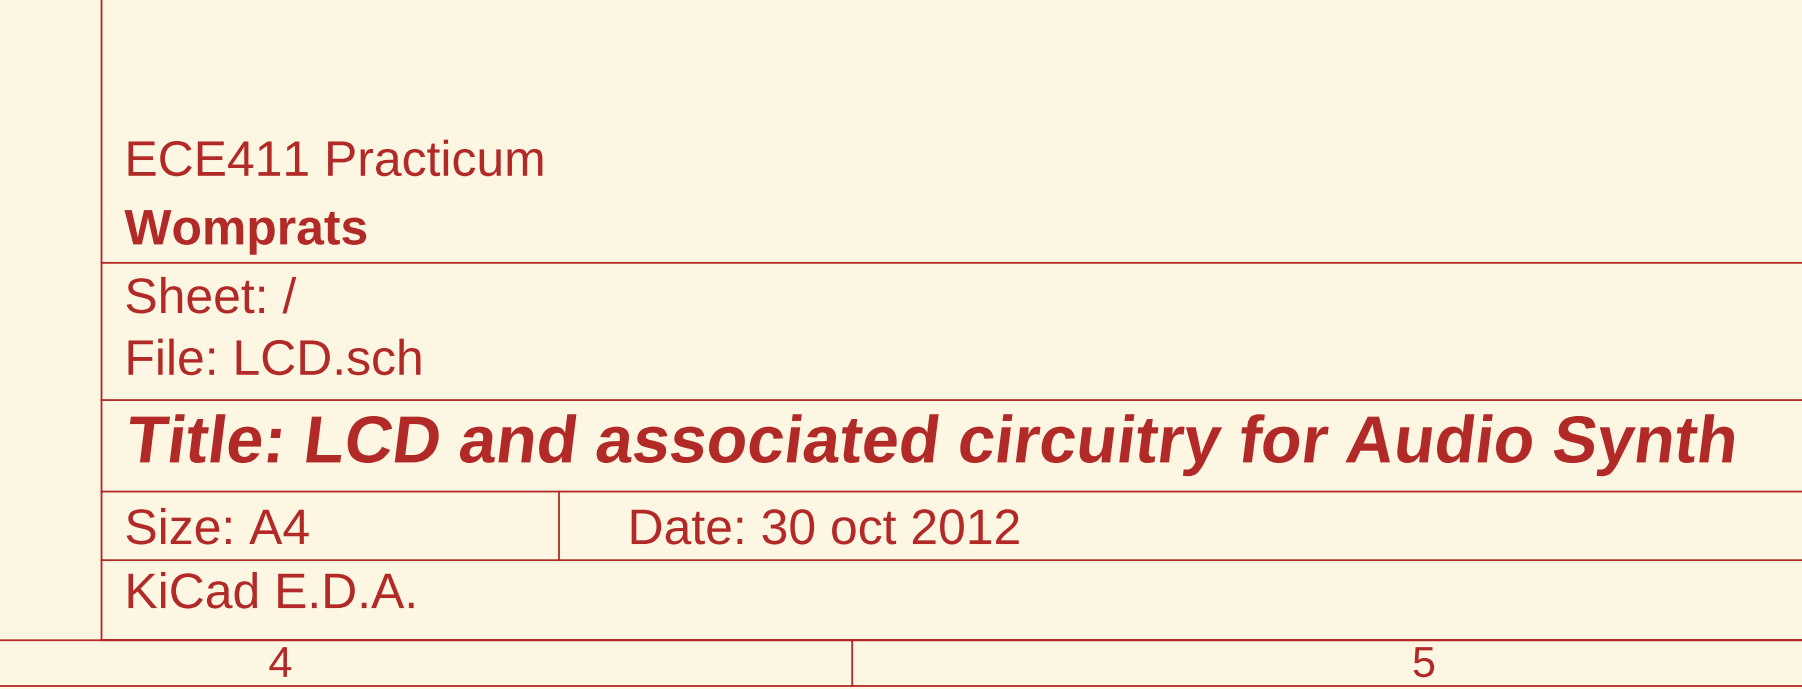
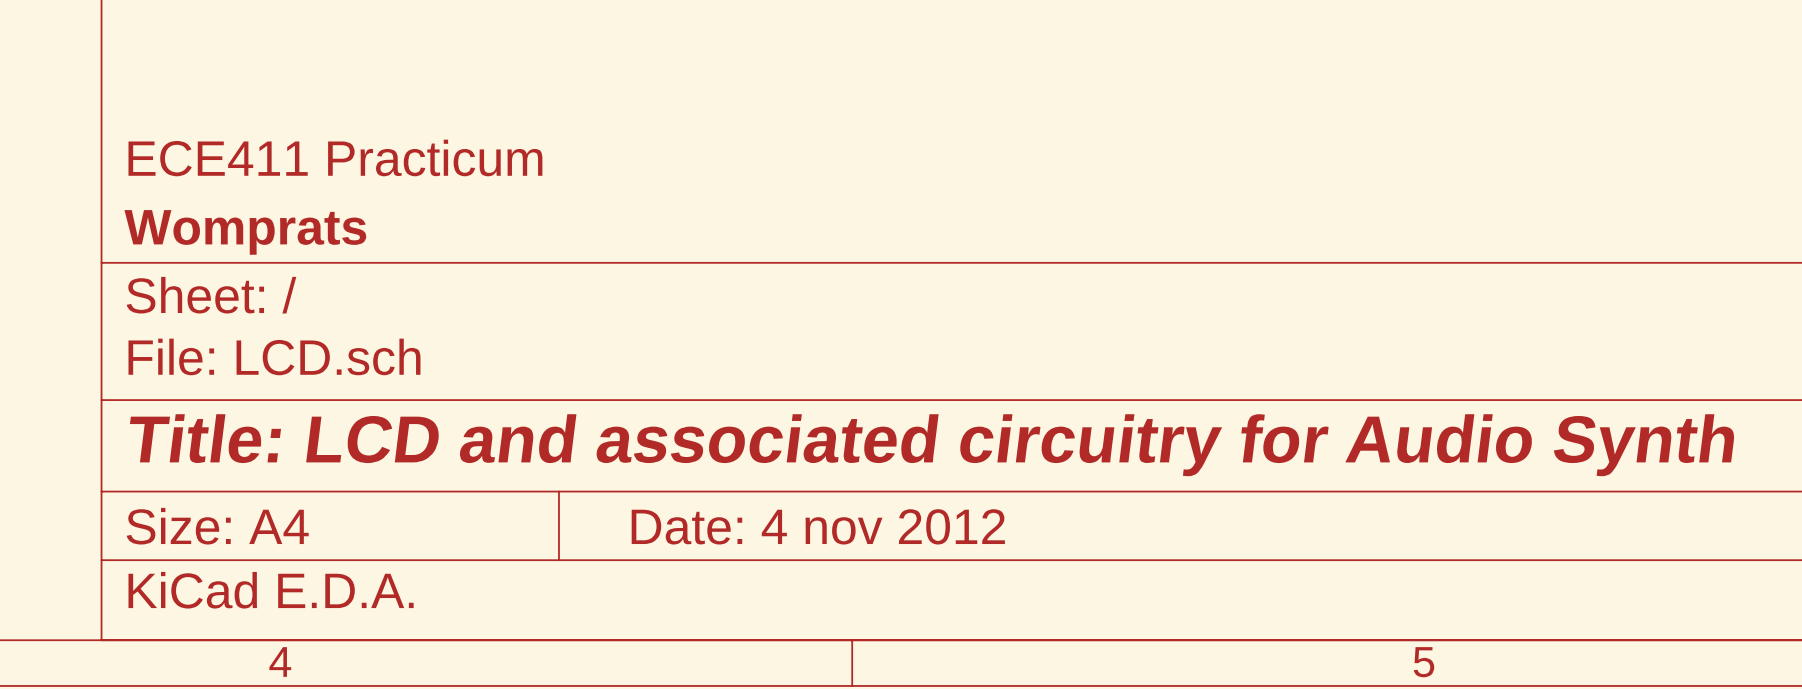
title block: Date: 30 oct 2012 (825, 526) -> Date: 4 nov 2012 (818, 526)

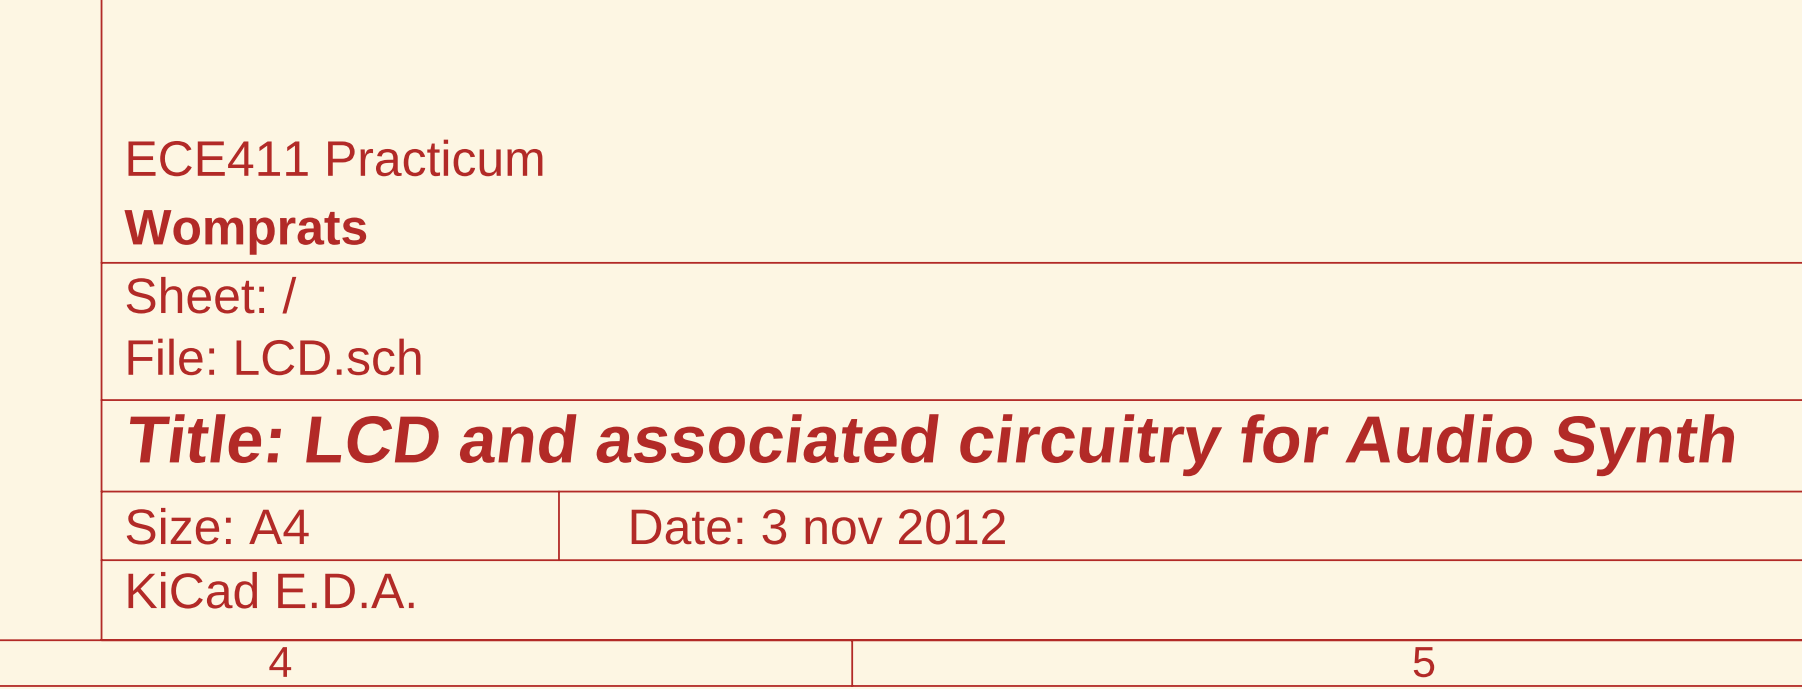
title block: Date: 4 nov 2012 (818, 526) -> Date: 3 nov 2012 (818, 526)

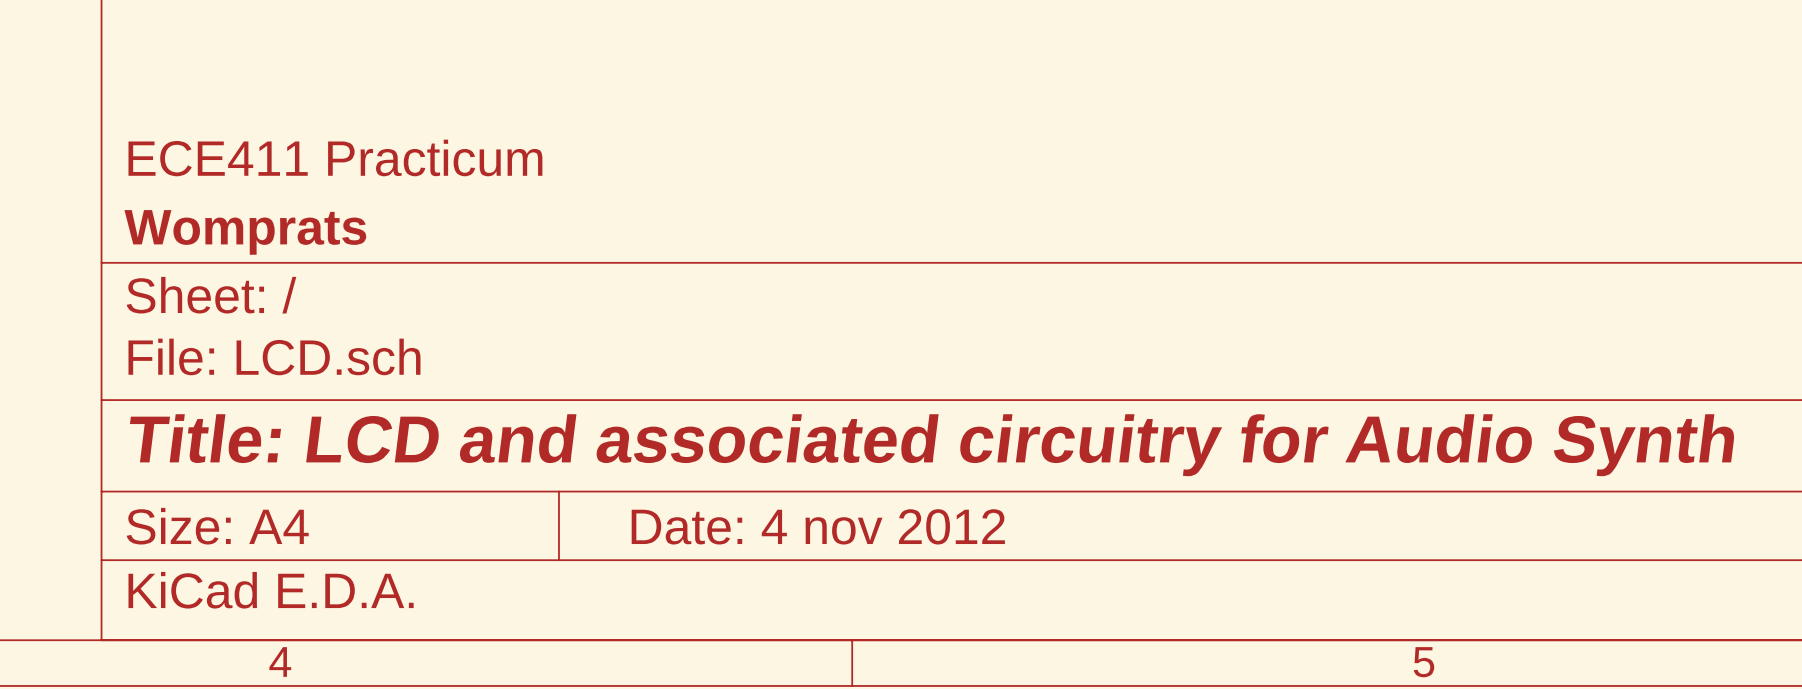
title block: Date: 3 nov 2012 (818, 526) -> Date: 4 nov 2012 (818, 526)

